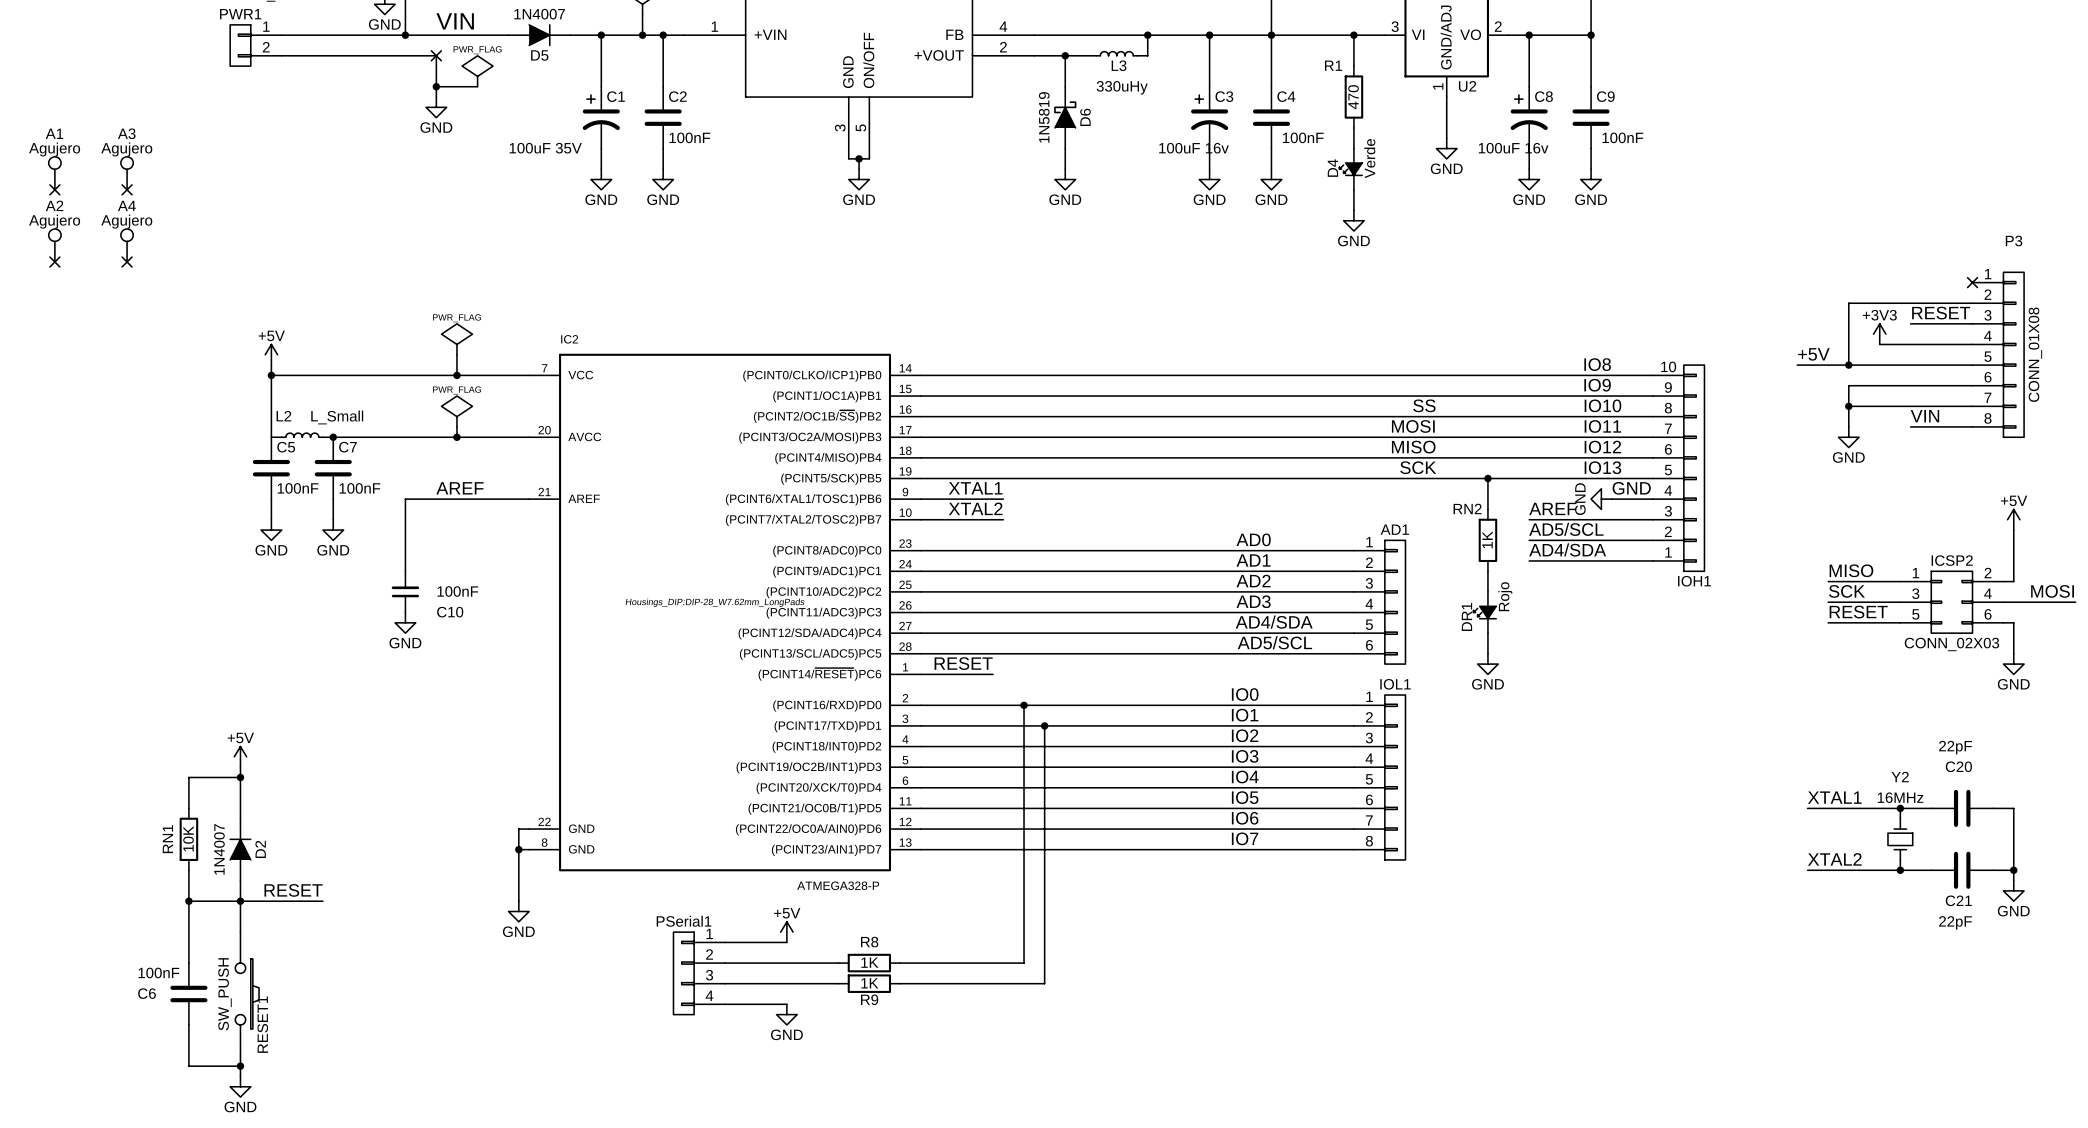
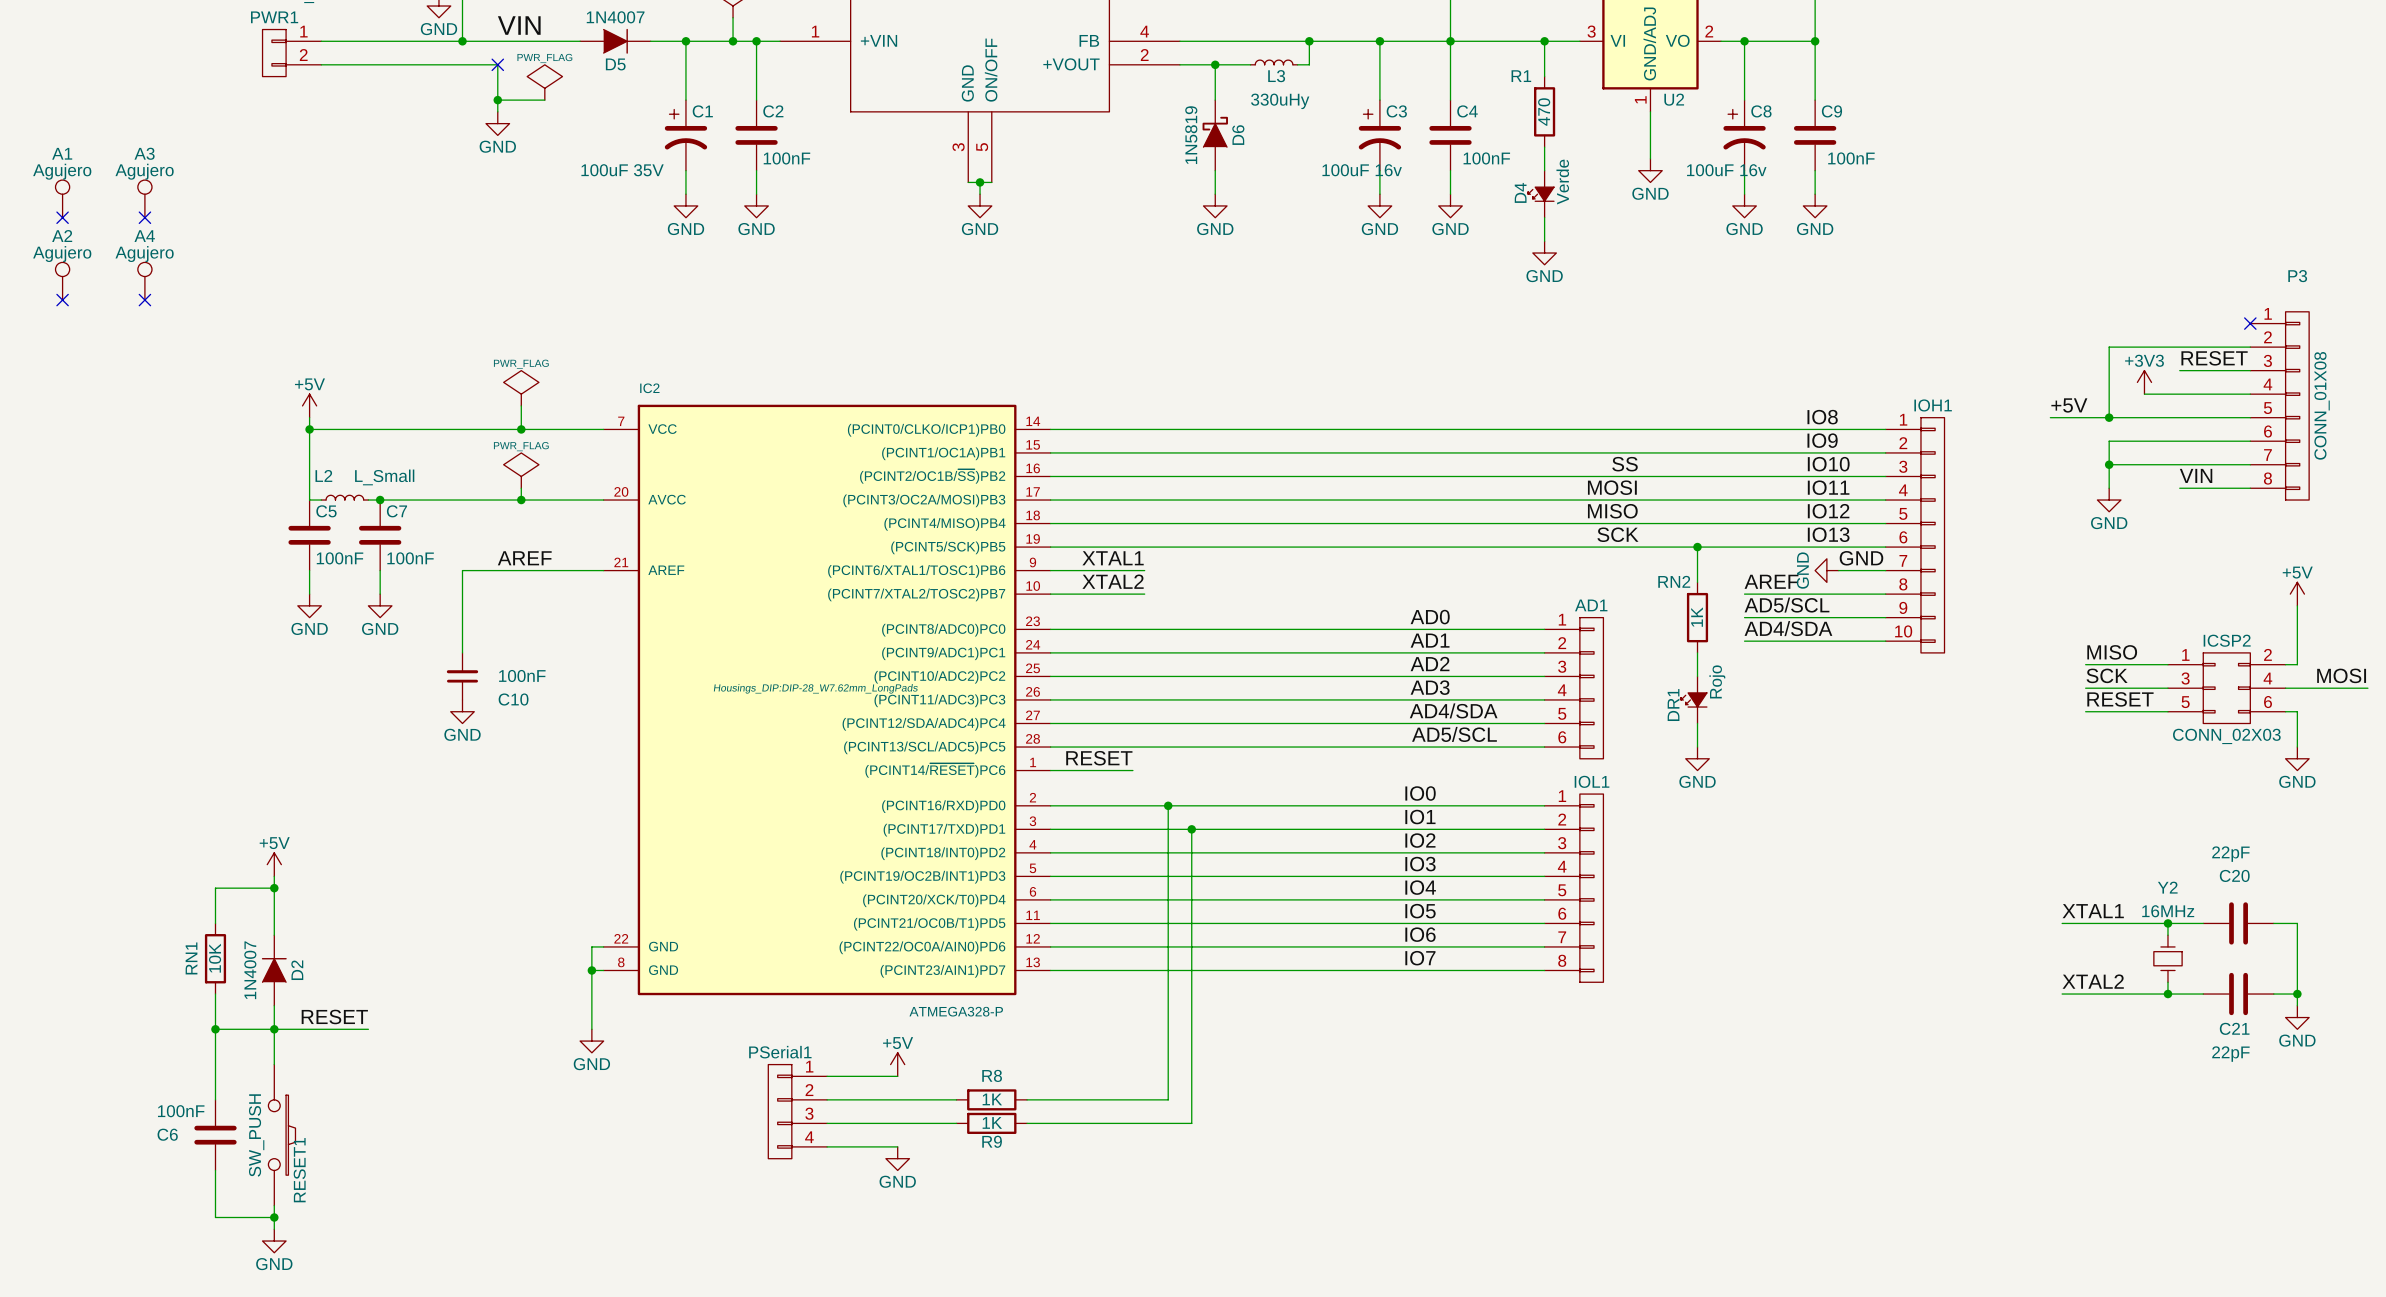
IOH1 flip: as is (1694, 468) -> up-down (1932, 535)

